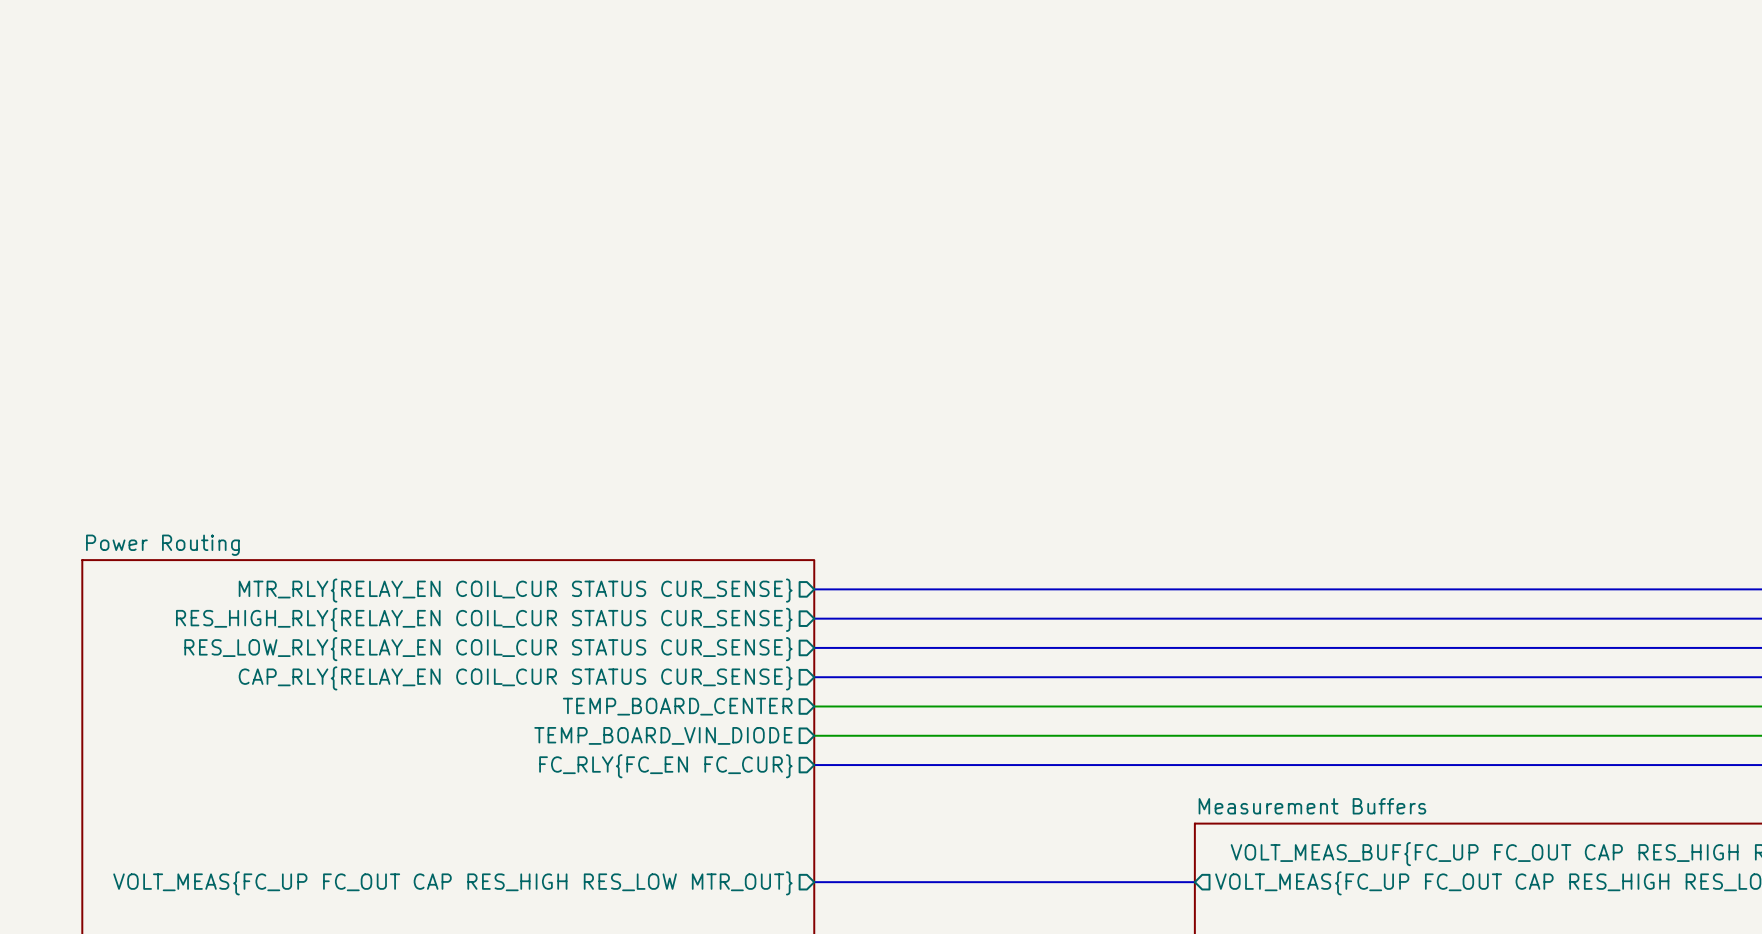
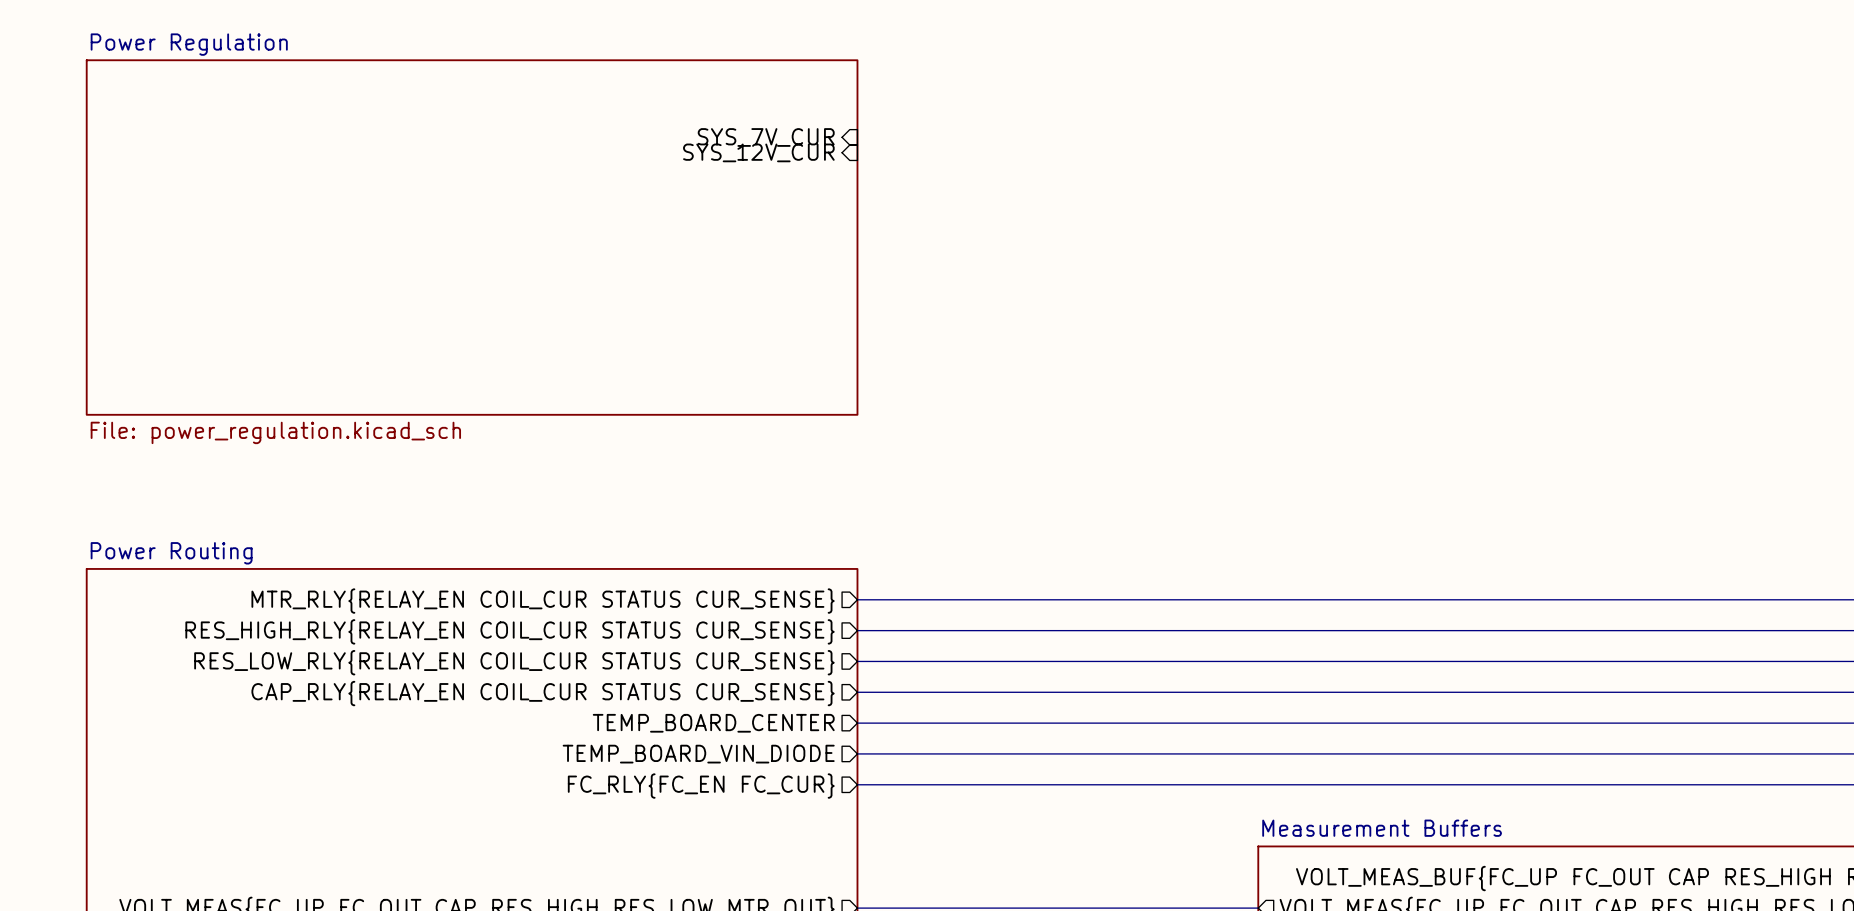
sheet pin: none -> SYS_7V_CUR (766, 137)
sheet pin: none -> SYS_12V_CUR (758, 152)
sheet Power Regulation: none -> File: power_regulation.kicad_sch (472, 237)

